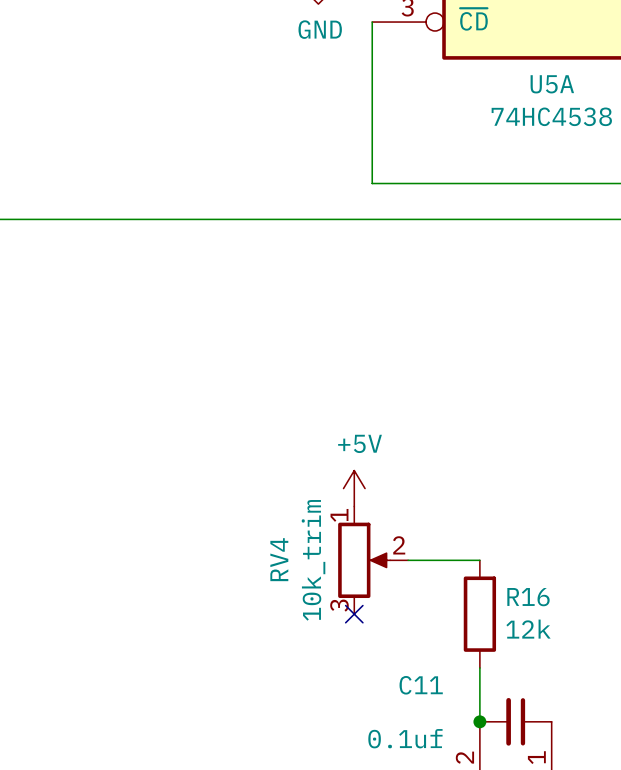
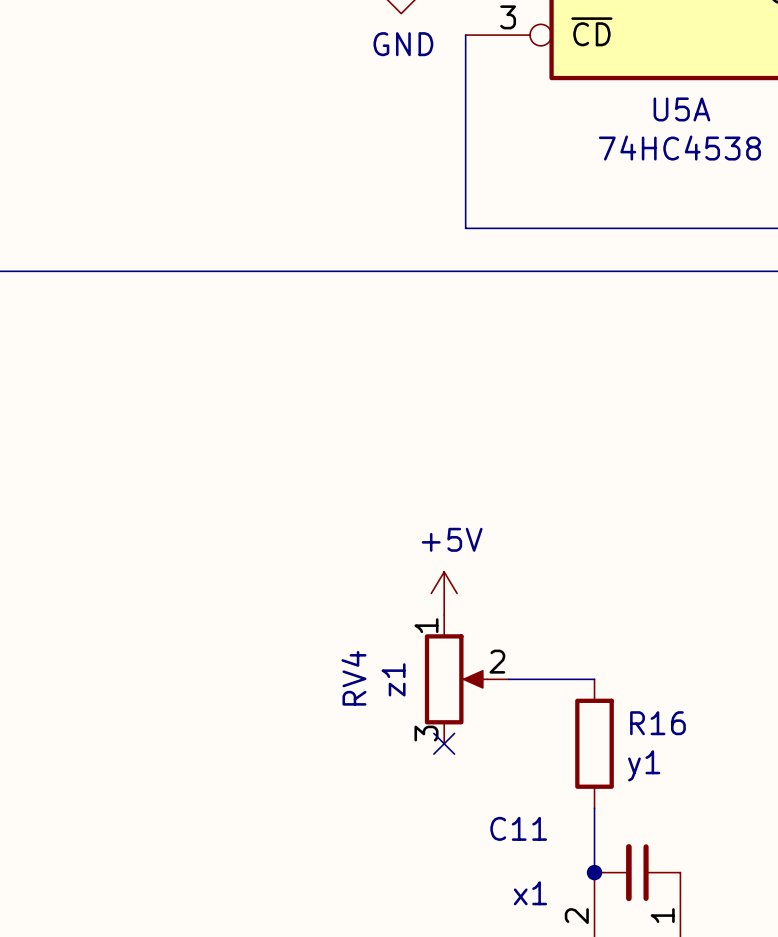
RV4 value: 10k_trim (313, 560) -> z1 (393, 679)
R16 value: 12k (528, 629) -> y1 (644, 765)
C11 value: 0.1uf (405, 738) -> x1 (530, 893)

